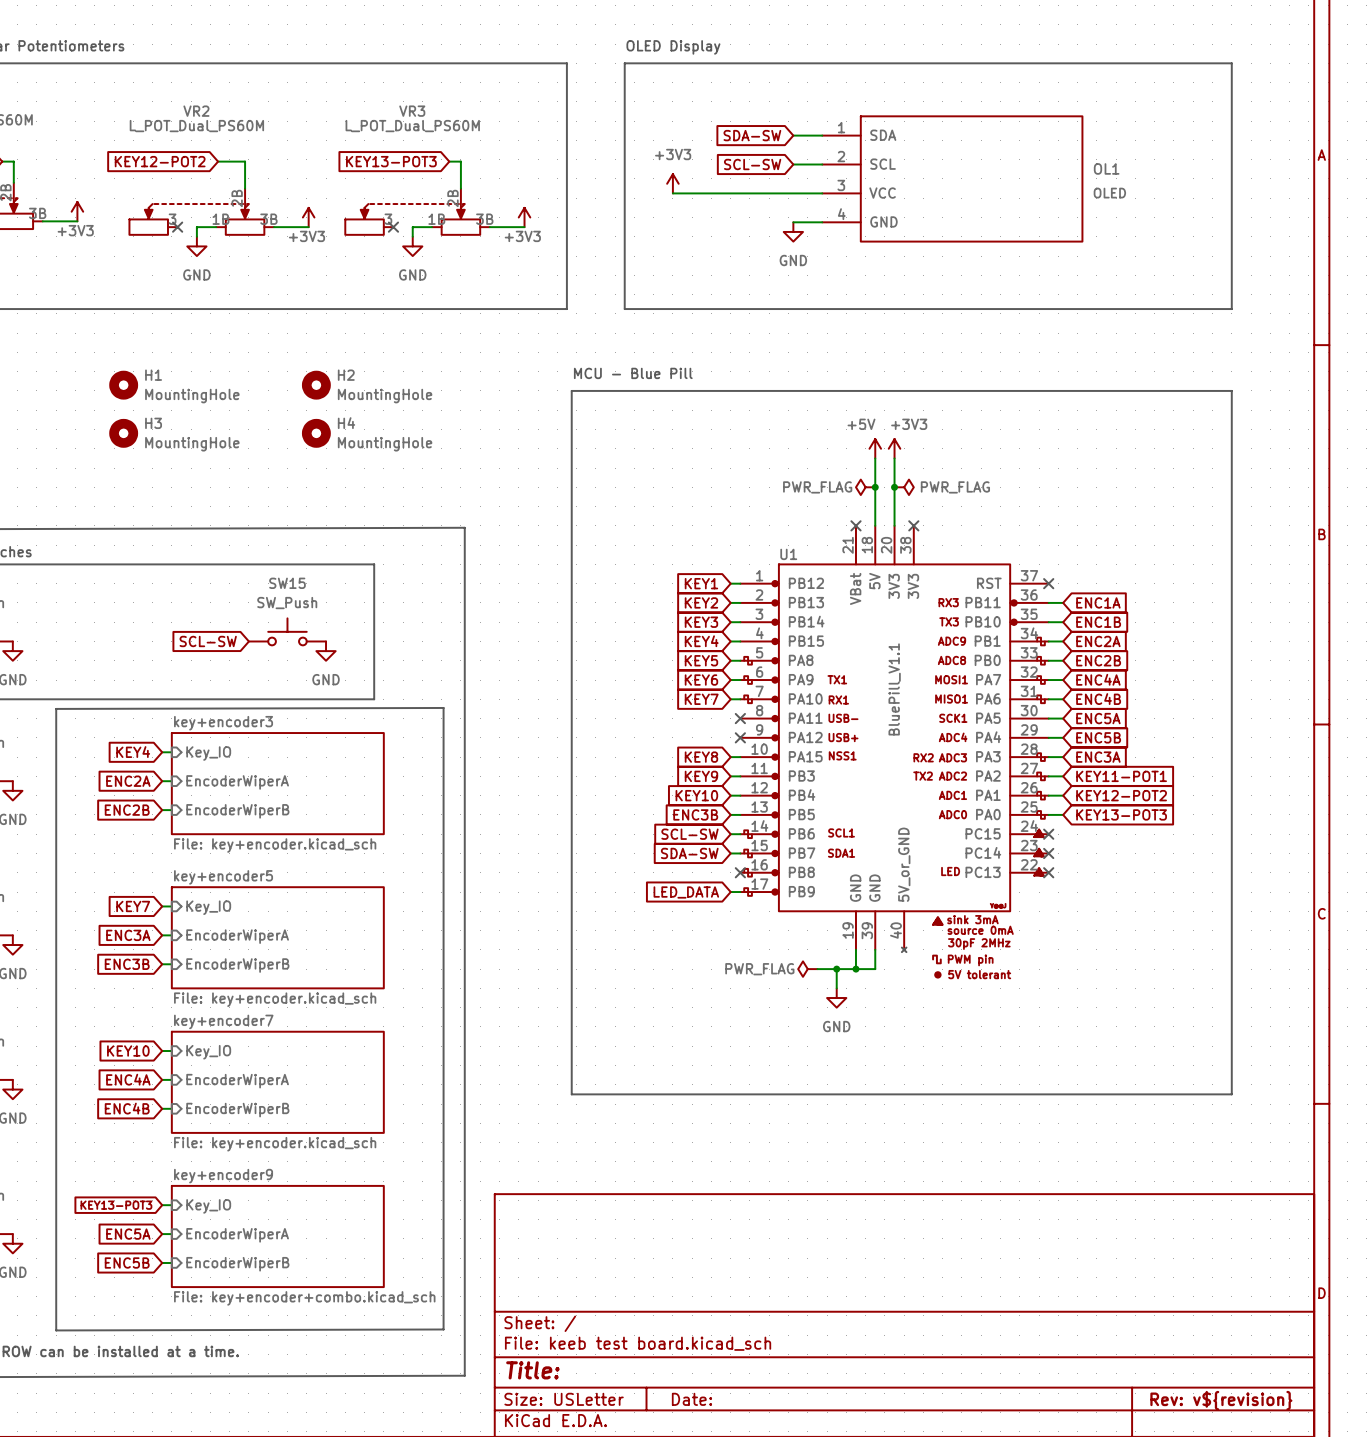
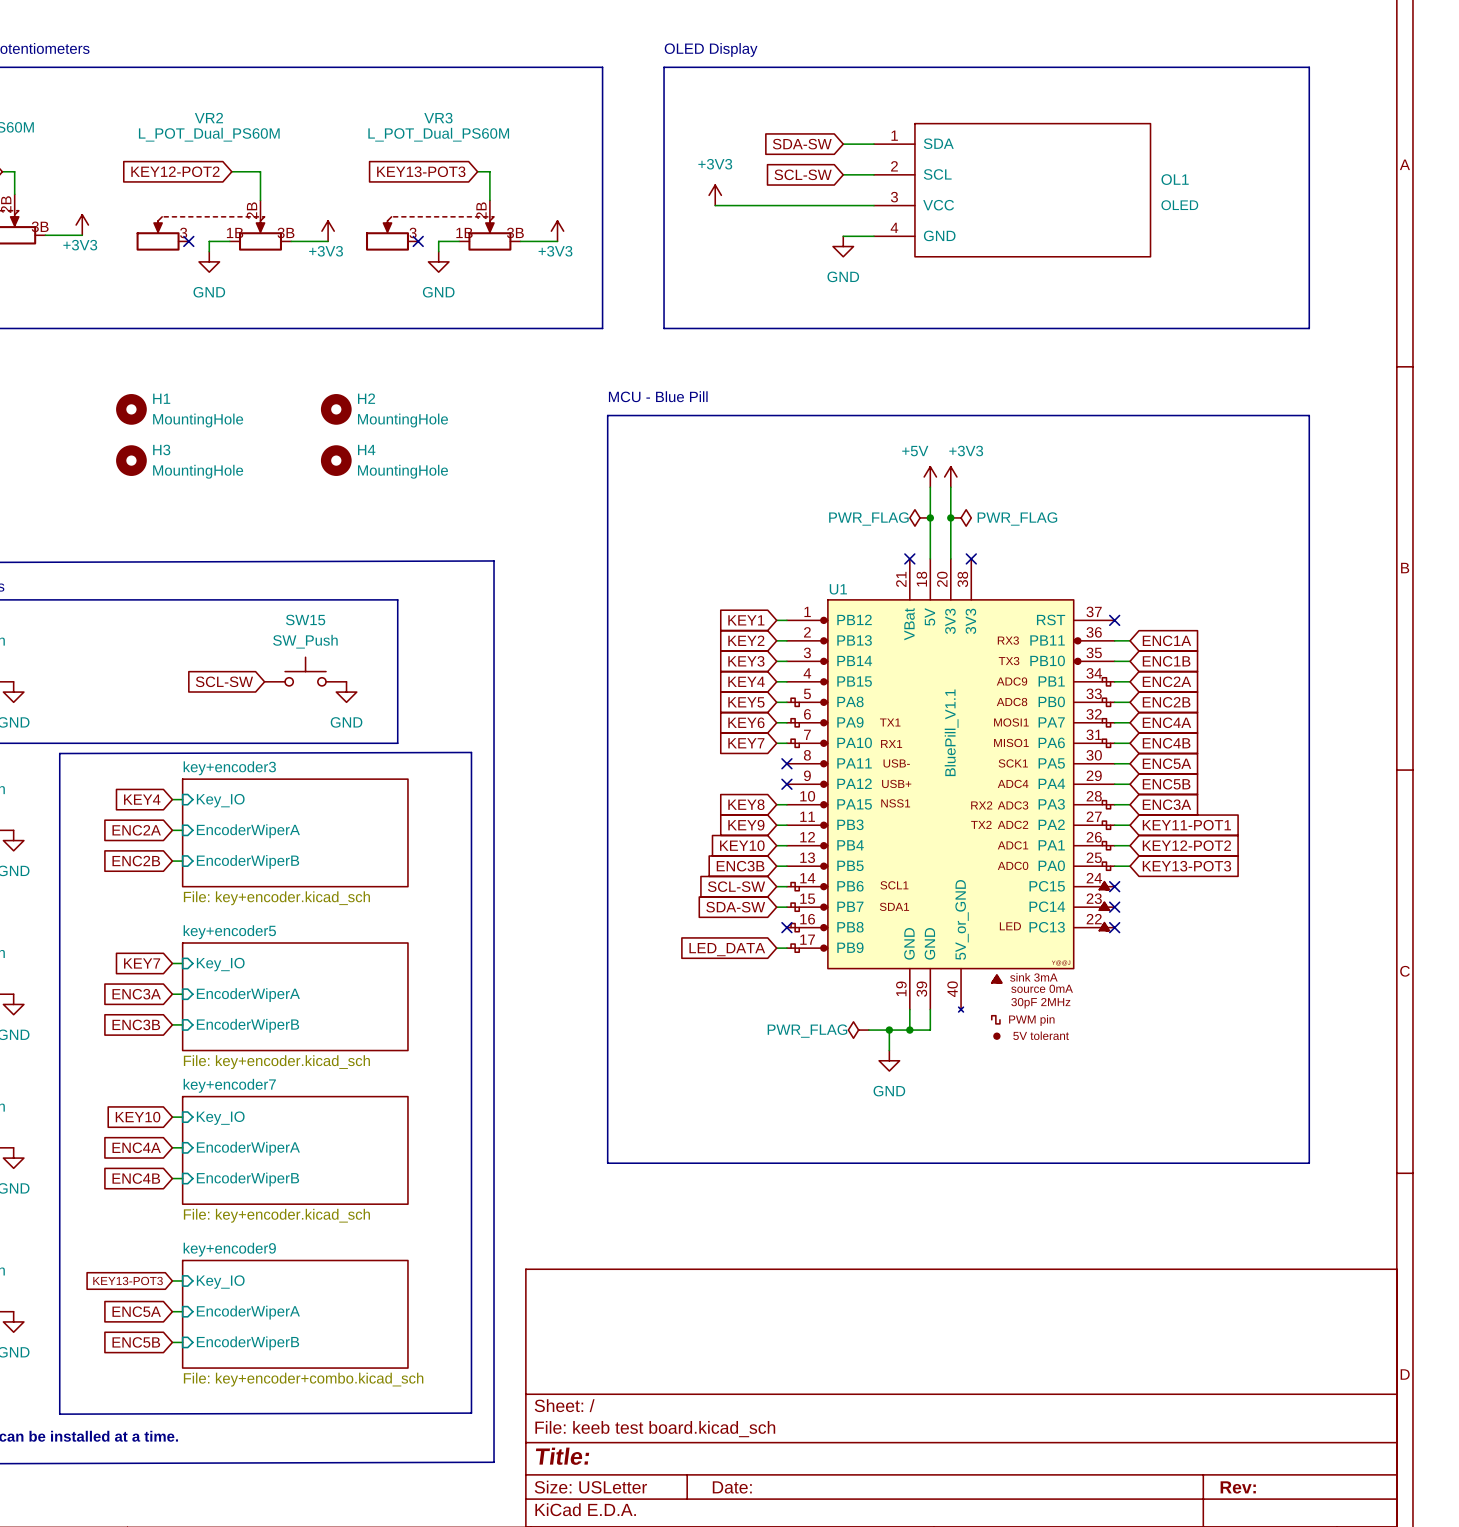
title block: Rev: v${revision} (1221, 1400) -> Rev: (1238, 1487)

